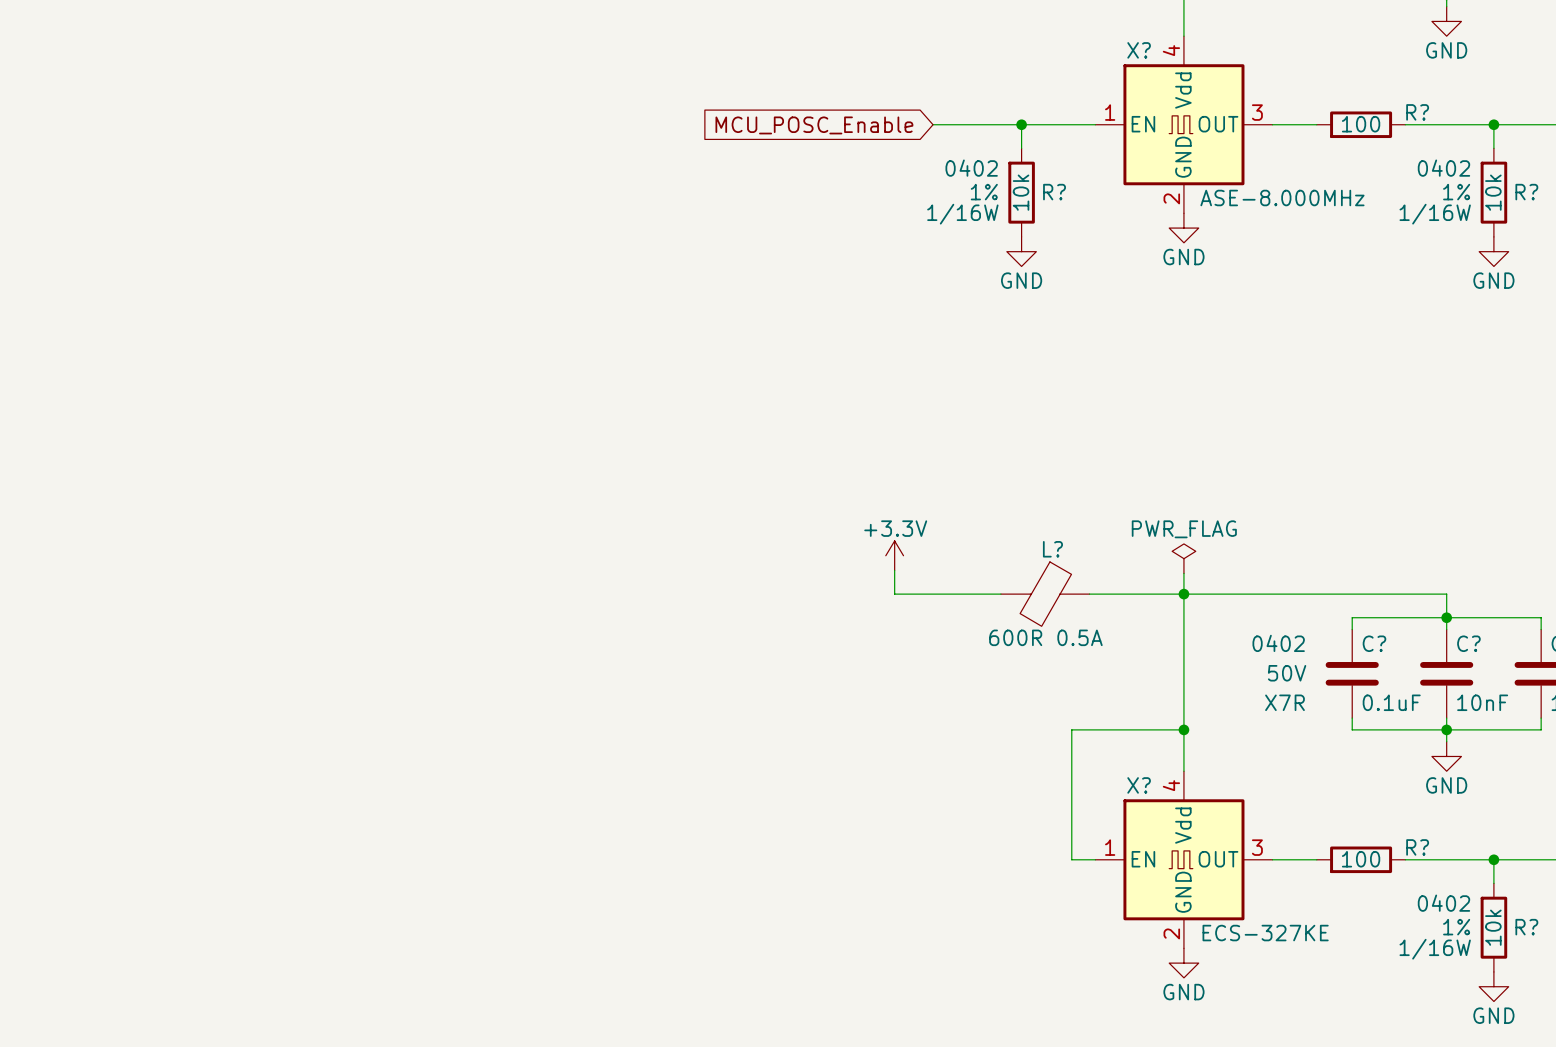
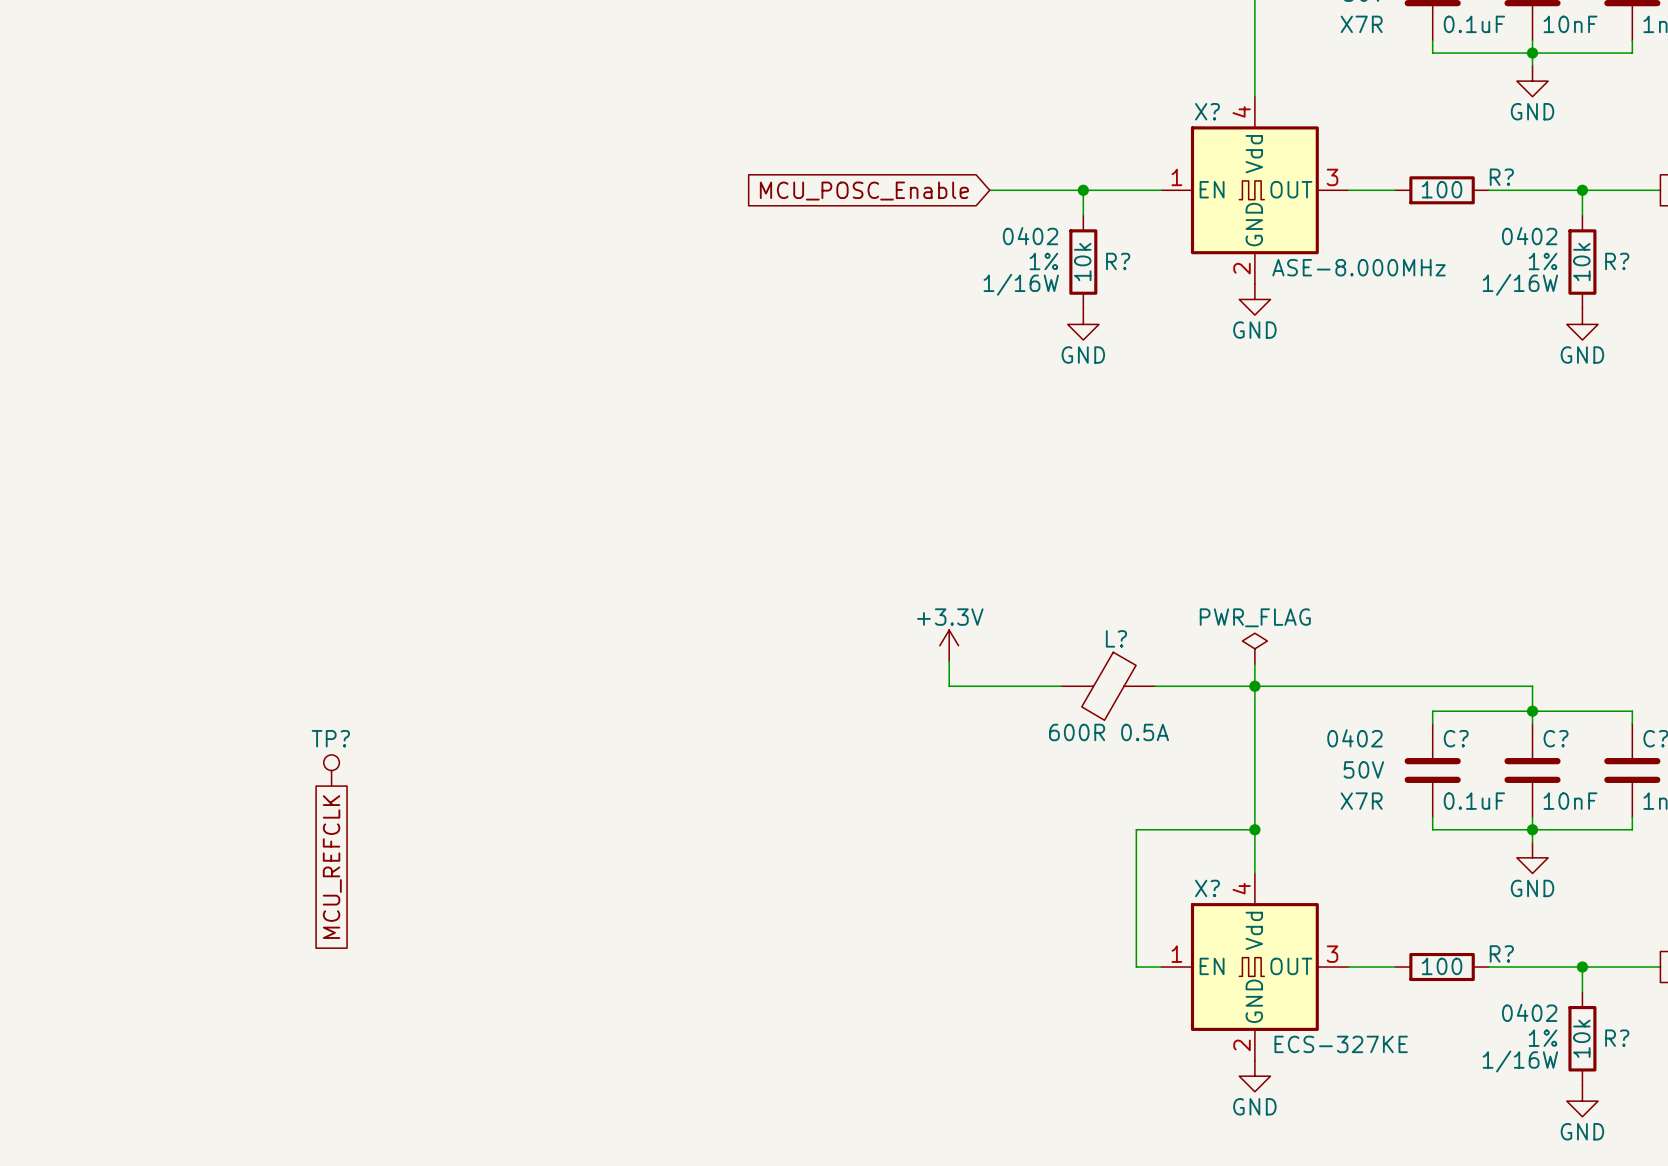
TP?: none -> (331, 770)
global label: none -> MCU_REFCLK (332, 867)

